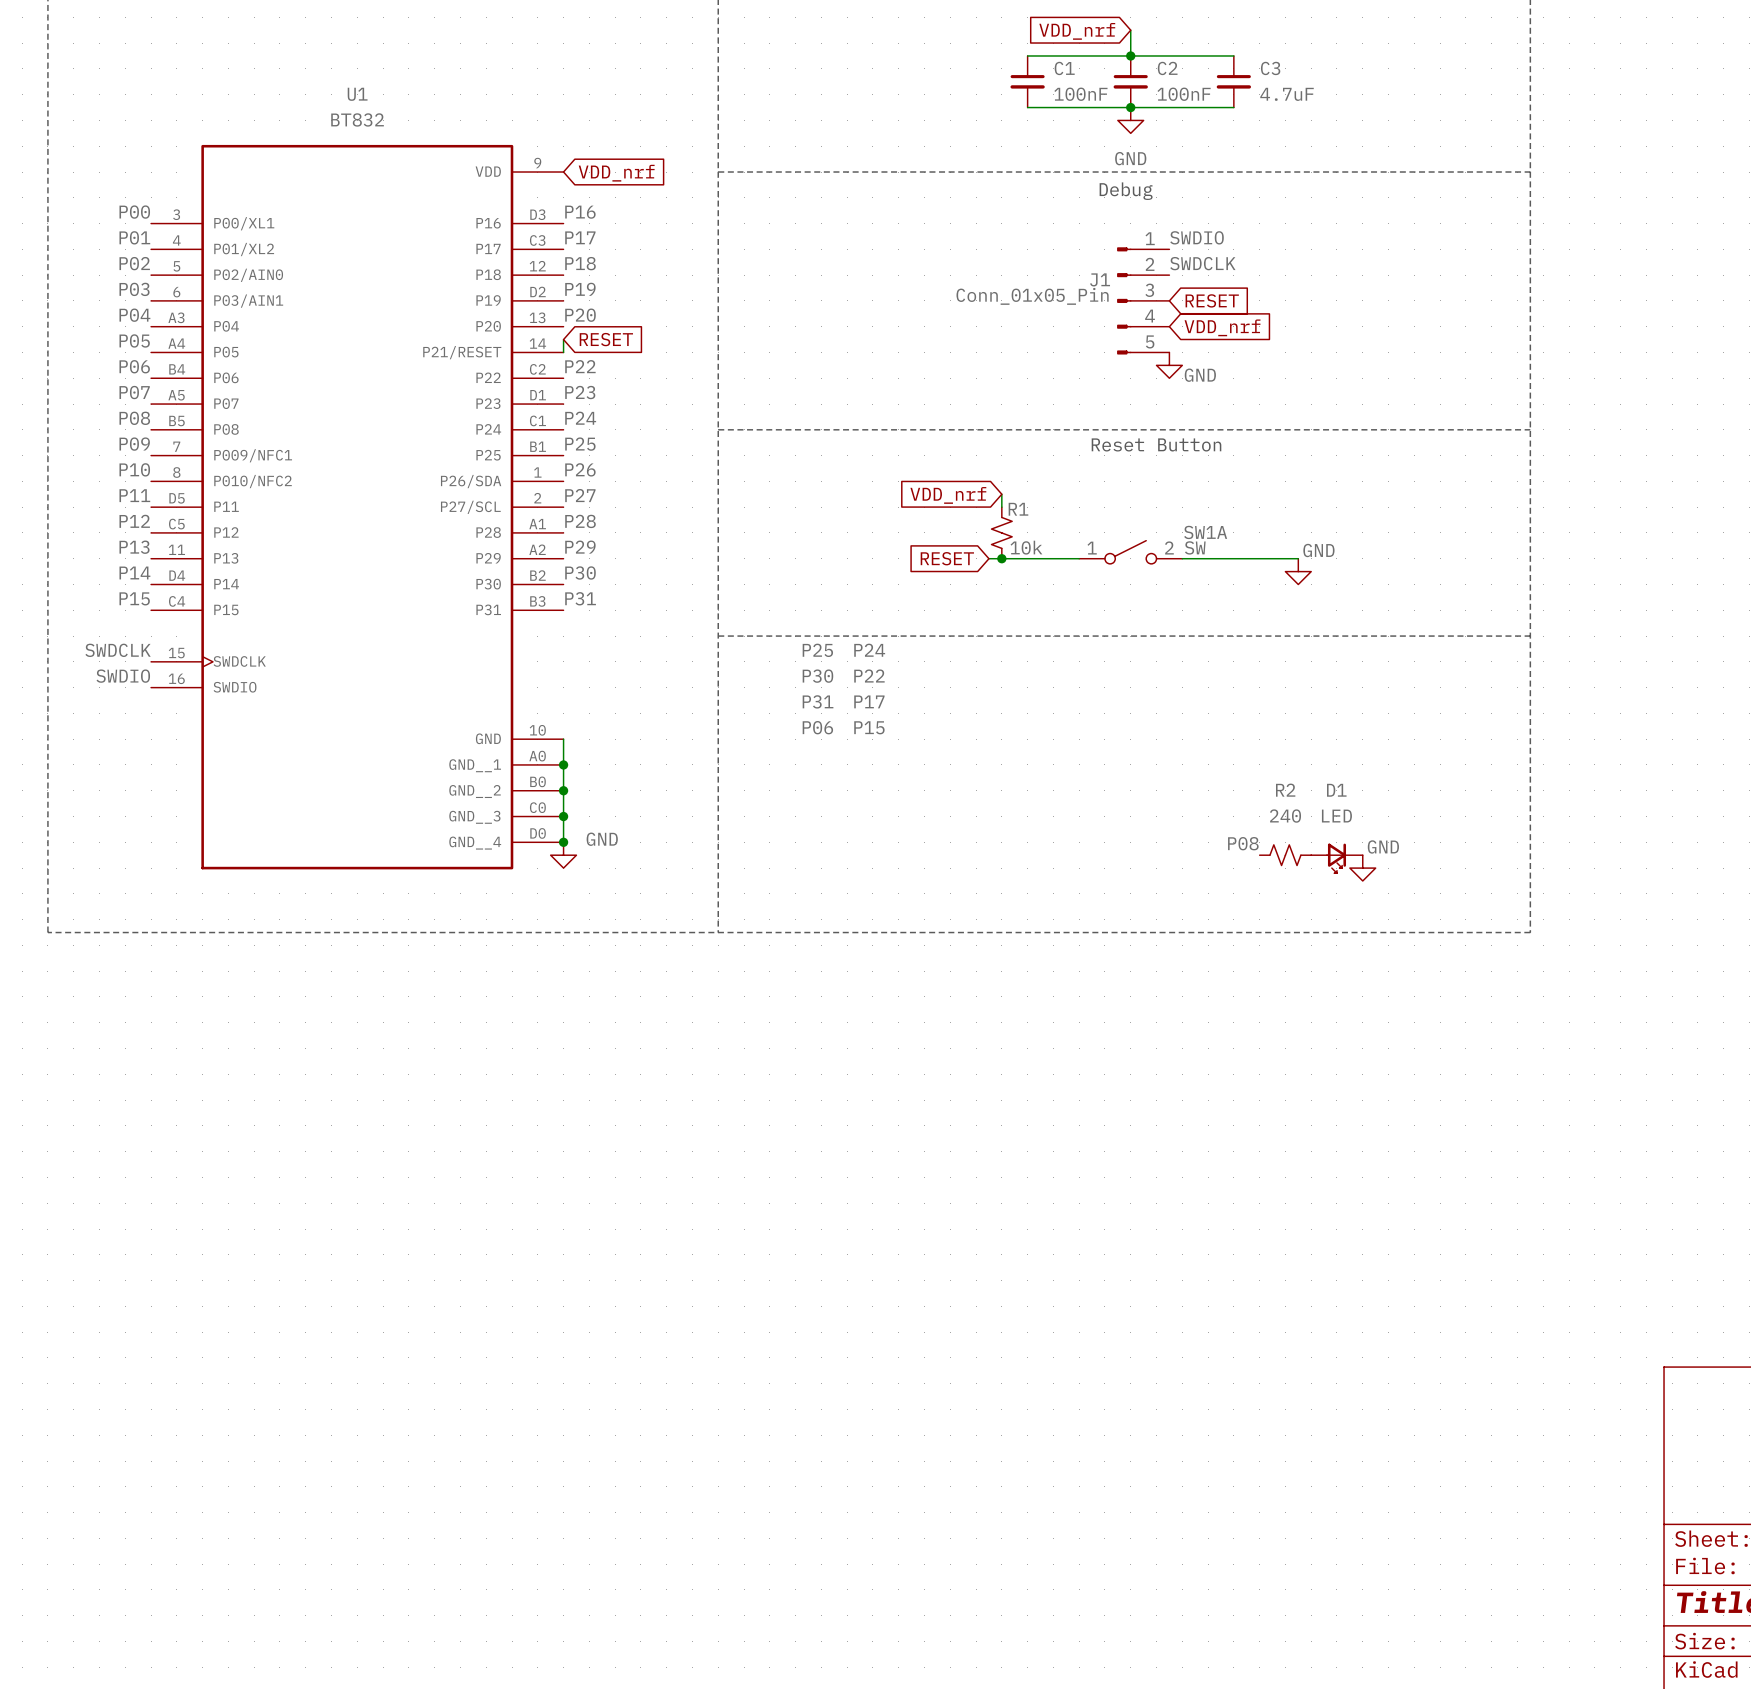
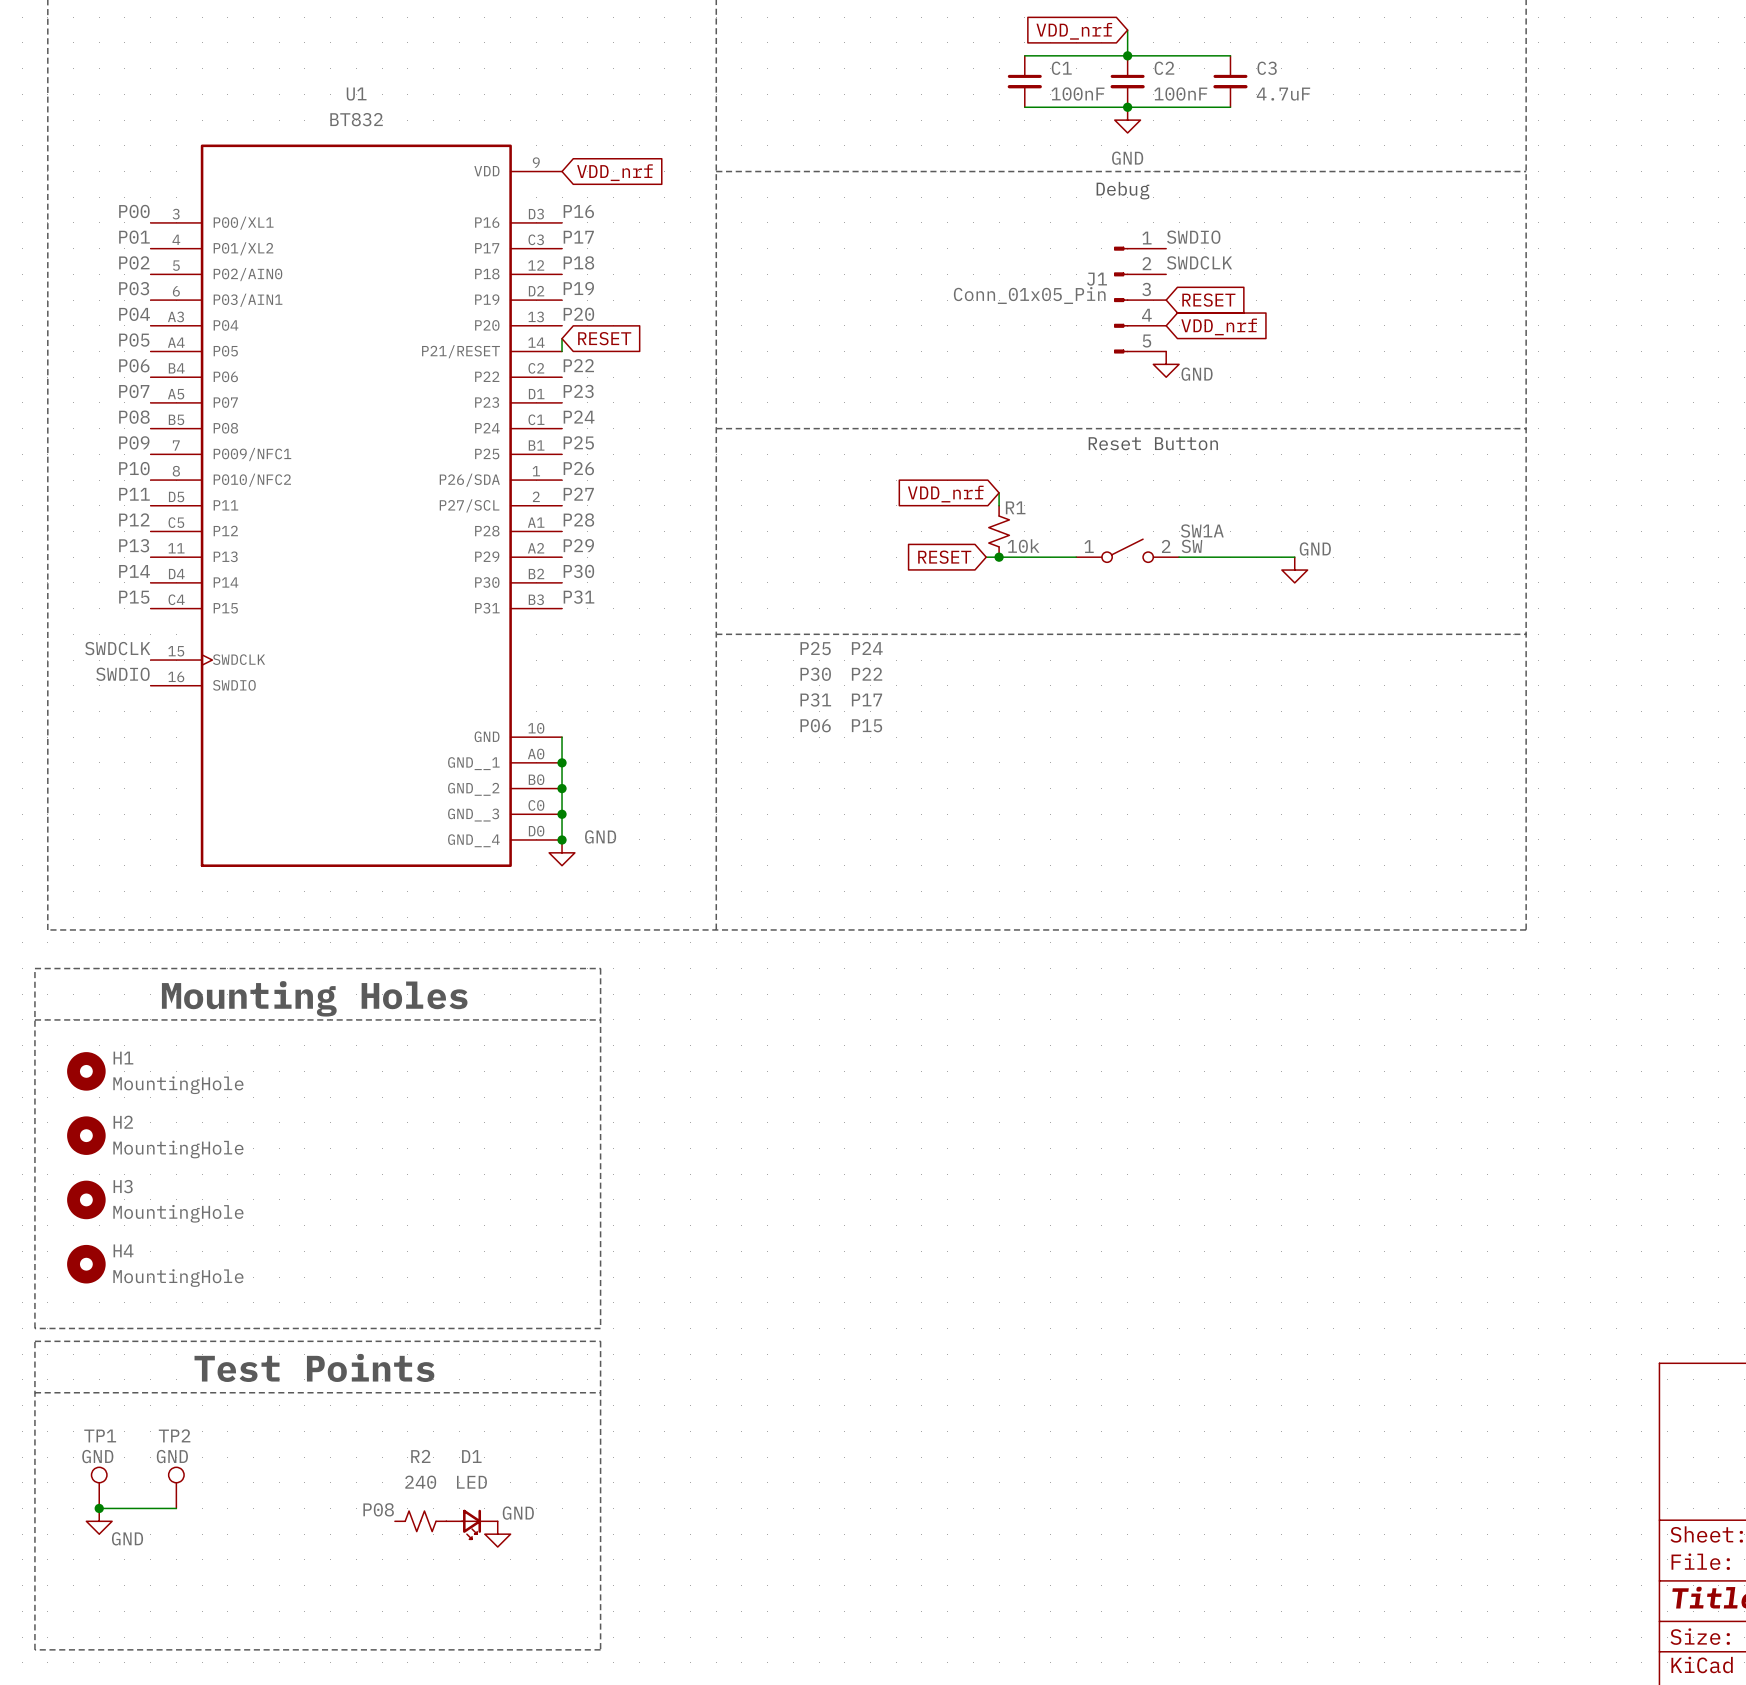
label: P08 (1243, 843) -> none
R2 position: (1285, 855) -> (420, 1521)
D1 position: (1336, 858) -> (472, 1524)
power symbol: GND (1362, 868) -> none
line: none -> (34, 968) (34, 1328) (600, 1328) (600, 968) (34, 968)
text: none -> Mounting Holes (314, 998)
line: none -> (34, 1019) (600, 1019)
H1: none -> MountingHole (86, 1071)
H2: none -> MountingHole (86, 1135)
H3: none -> MountingHole (86, 1199)
H4: none -> MountingHole (86, 1264)
line: none -> (34, 1341) (600, 1341) (600, 1649) (34, 1649) (34, 1341)
text: none -> Test Points (314, 1367)
line: none -> (34, 1392) (600, 1392)
TP1: none -> GND (99, 1487)
TP2: none -> GND (176, 1487)
wire: none -> (99, 1508) (176, 1508)
junction: none -> (99, 1508)
label: none -> P08 (378, 1509)
power symbol: none -> GND (99, 1521)
power symbol: none -> GND (497, 1534)

